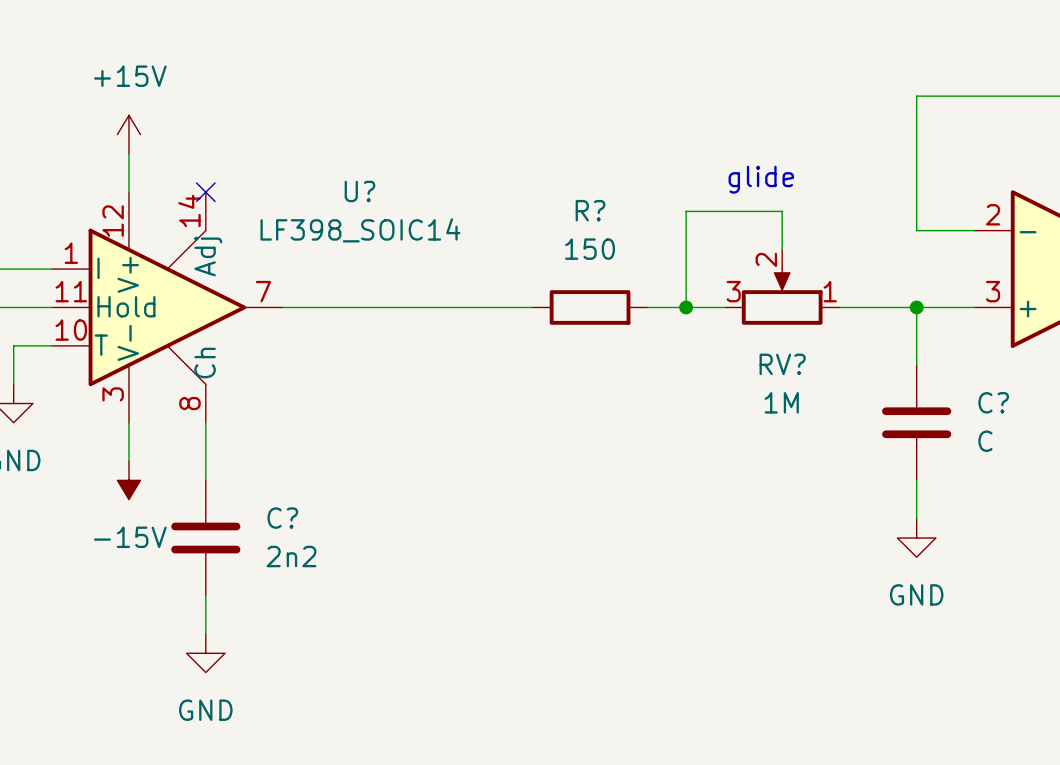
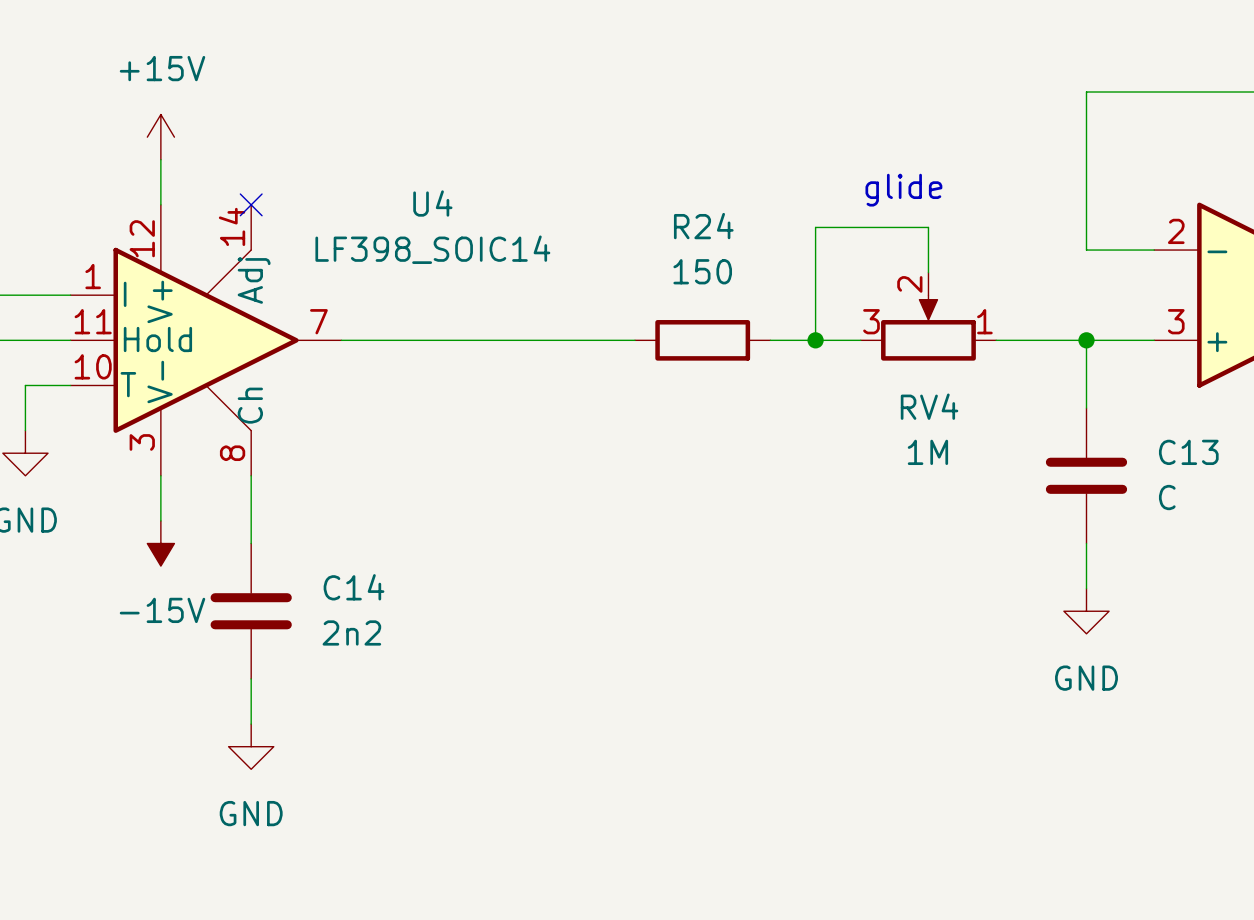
U? name: U? (359, 191) -> U4 (432, 203)
R? name: R? (590, 210) -> R24 (703, 226)
RV? name: RV? (782, 364) -> RV4 (929, 406)
C? name: C? (993, 402) -> C13 (1188, 452)
C? name: C? (282, 518) -> C14 (354, 587)

